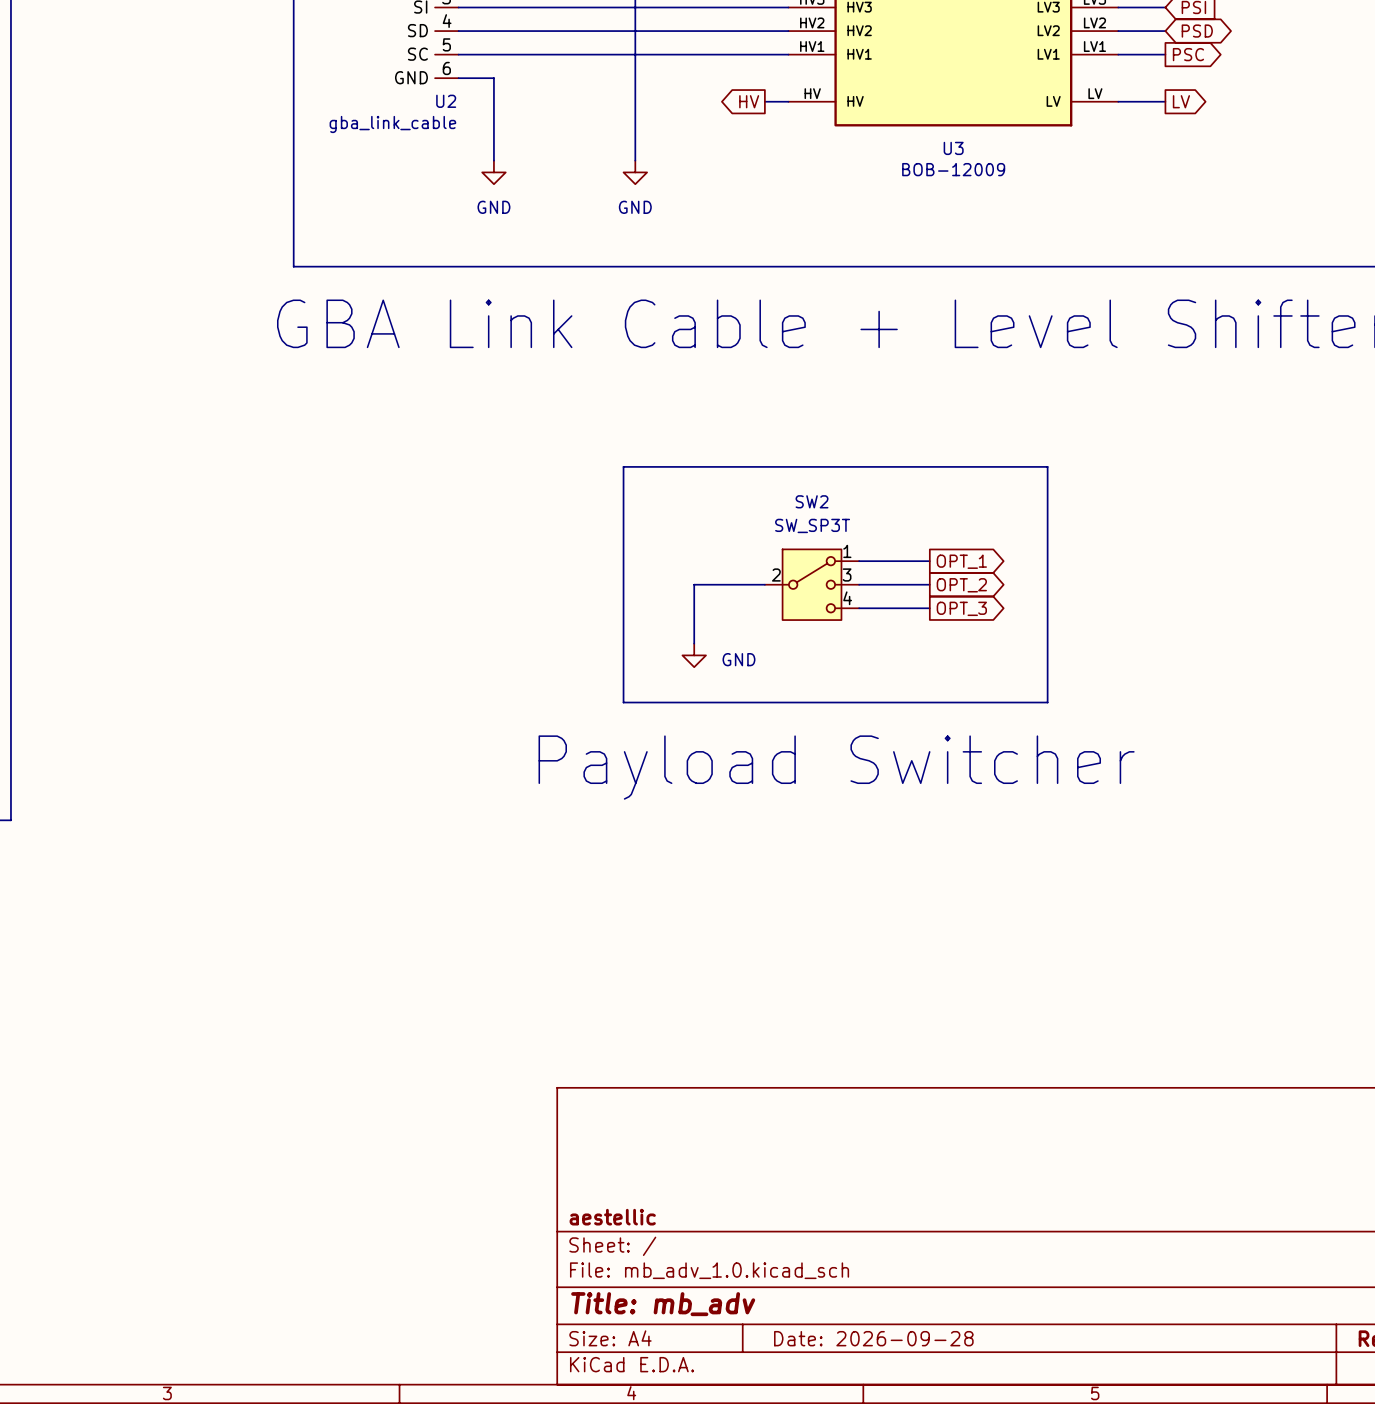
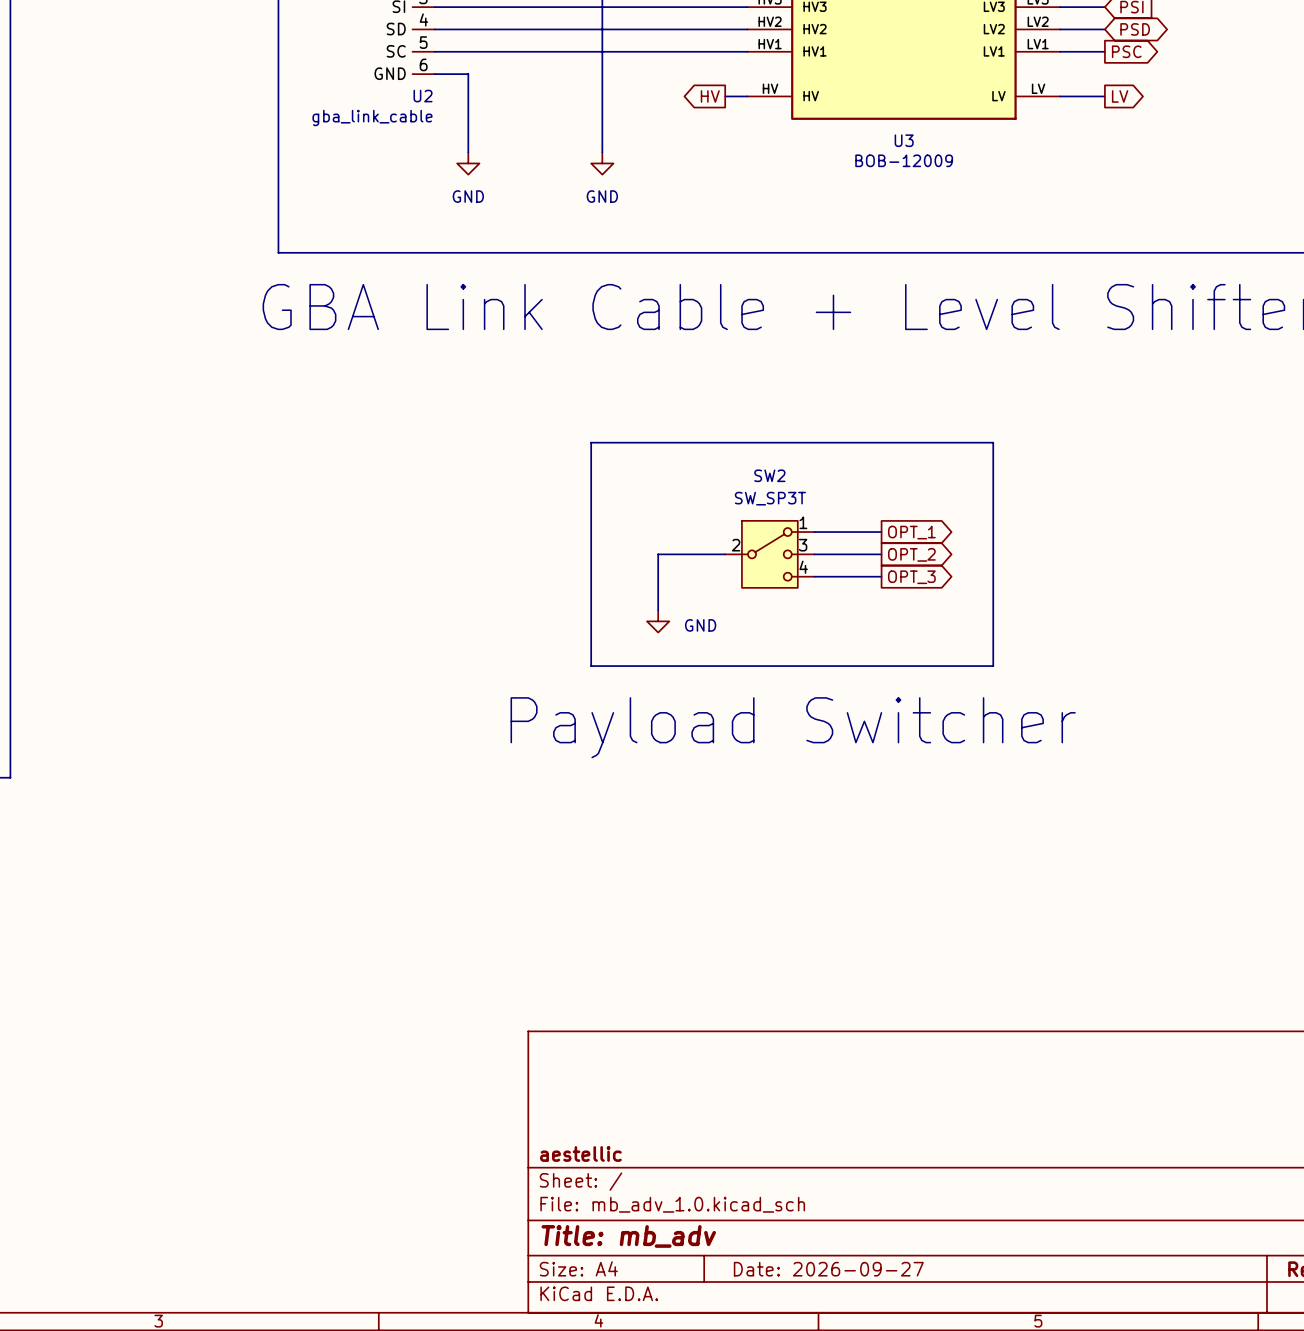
title block: Date: 2026-09-28 (873, 1338) -> Date: 2026-09-27 (828, 1269)

